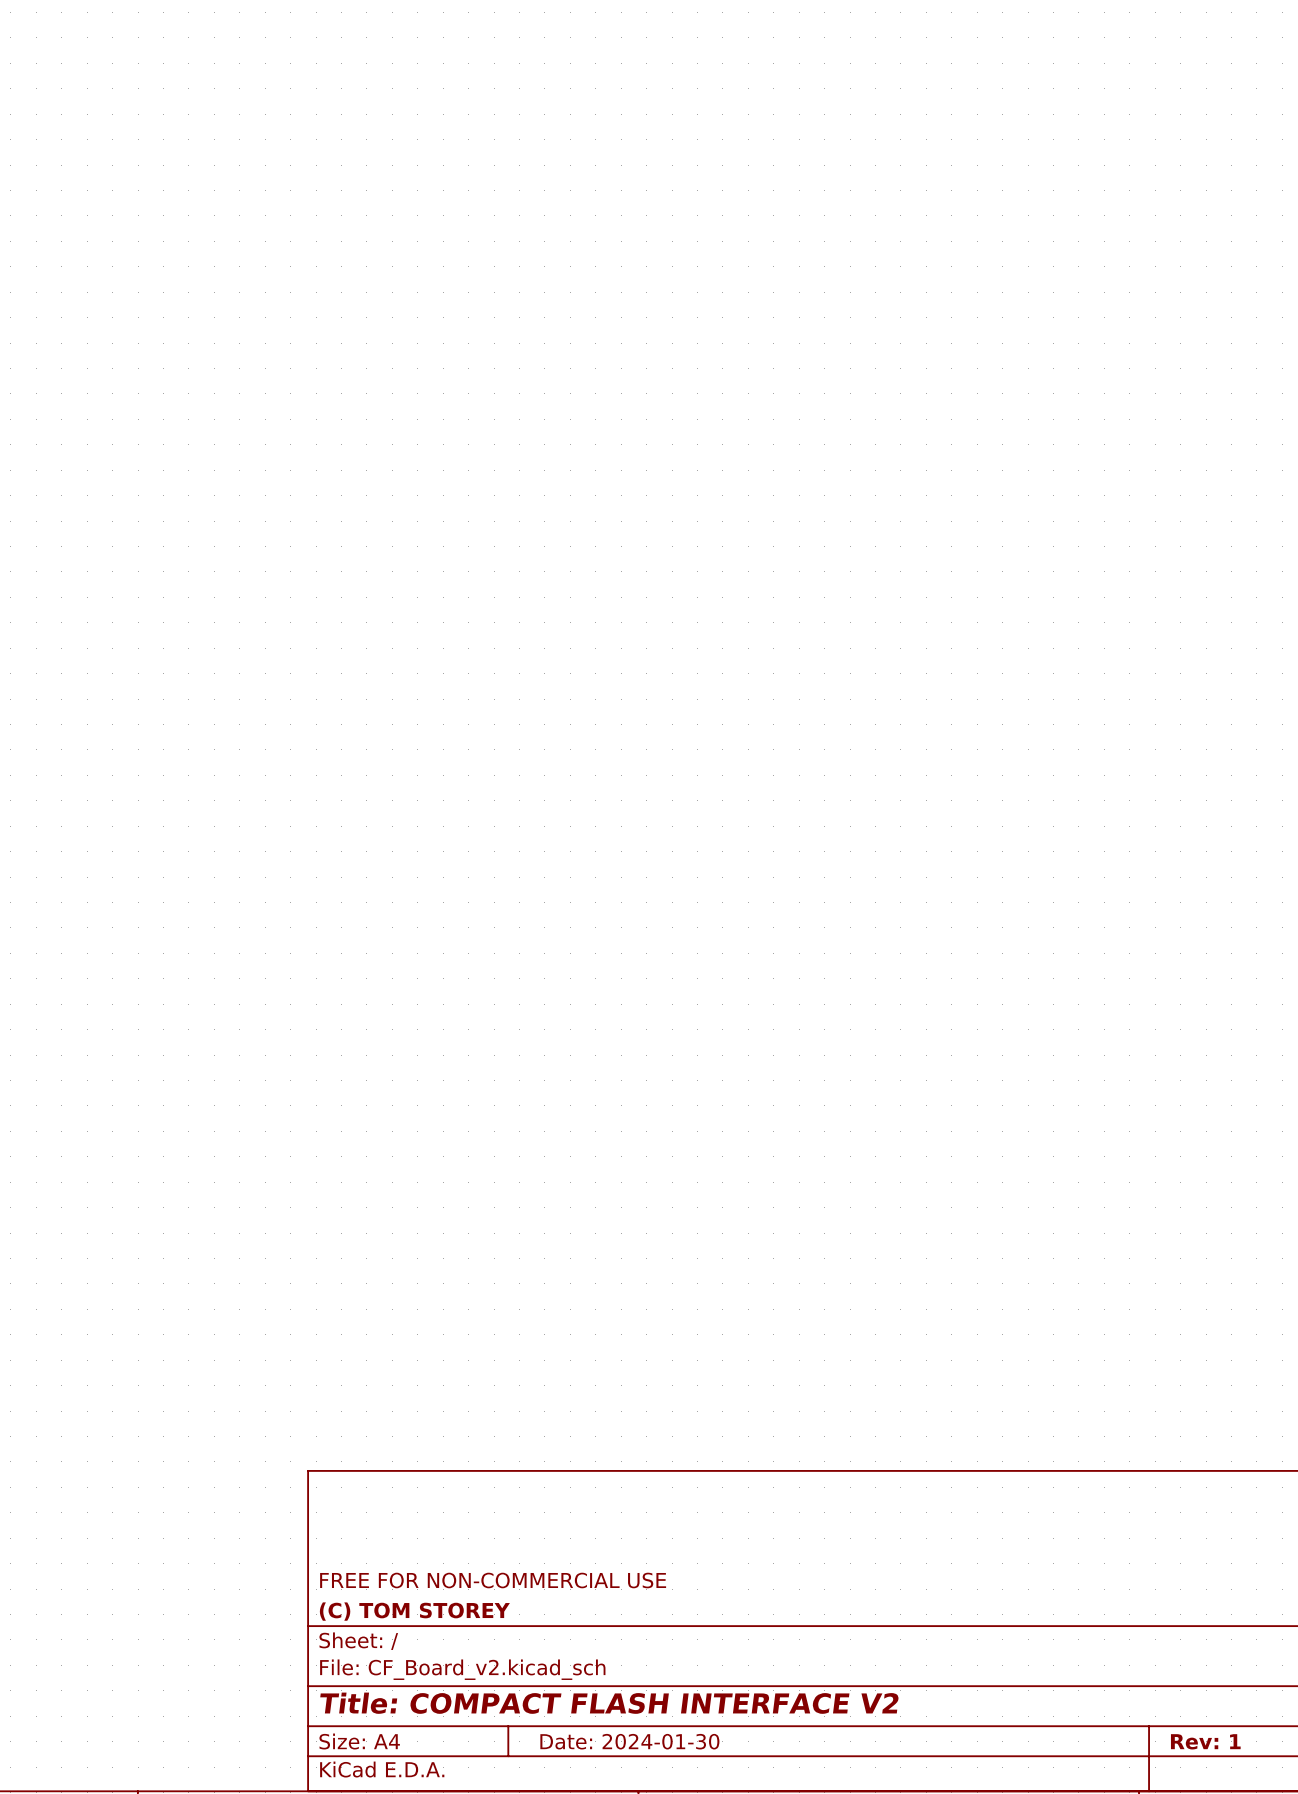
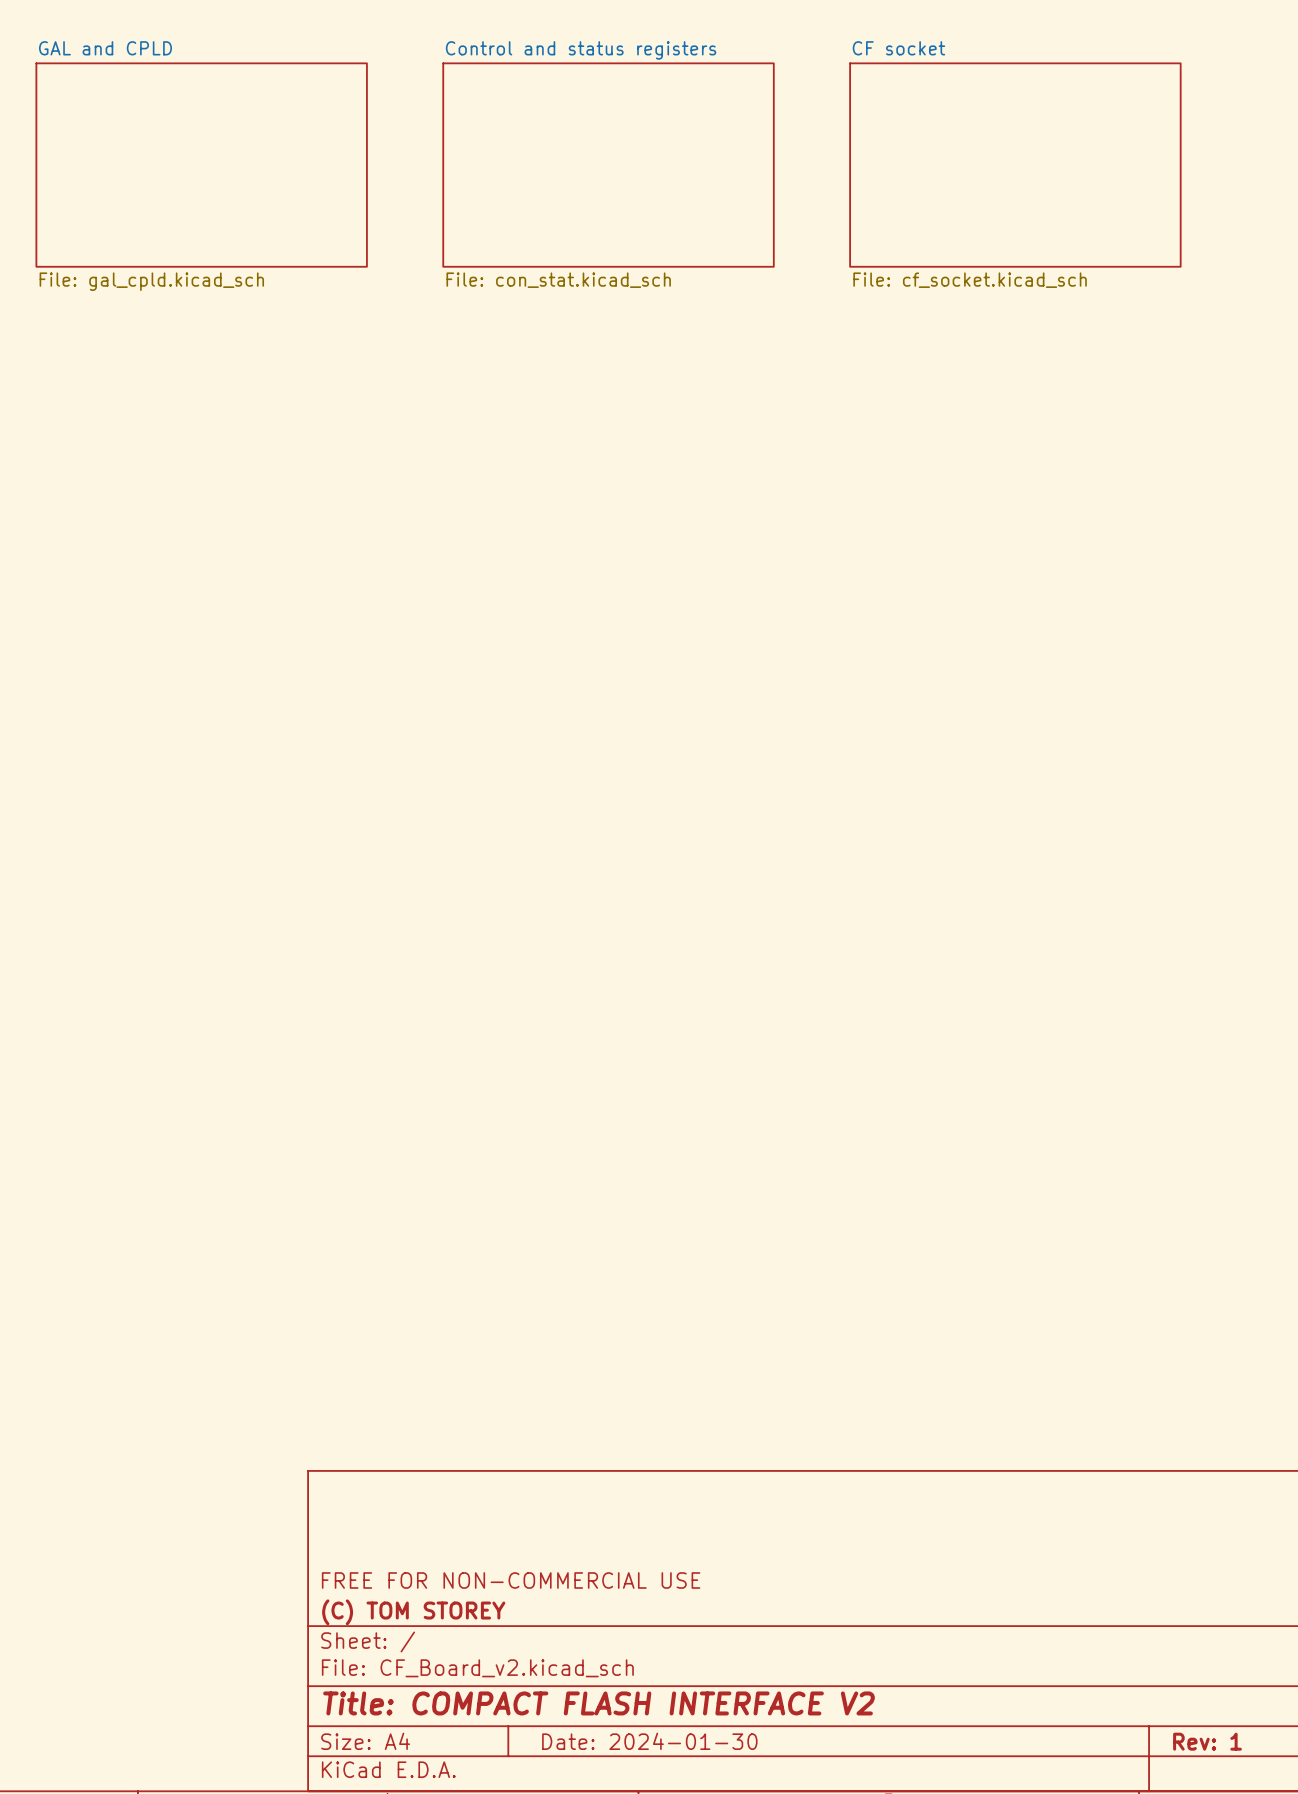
sheet GAL and CPLD: none -> File: gal_cpld.kicad_sch (201, 165)
sheet Control and status registers: none -> File: con_stat.kicad_sch (608, 165)
sheet CF socket: none -> File: cf_socket.kicad_sch (1015, 165)

